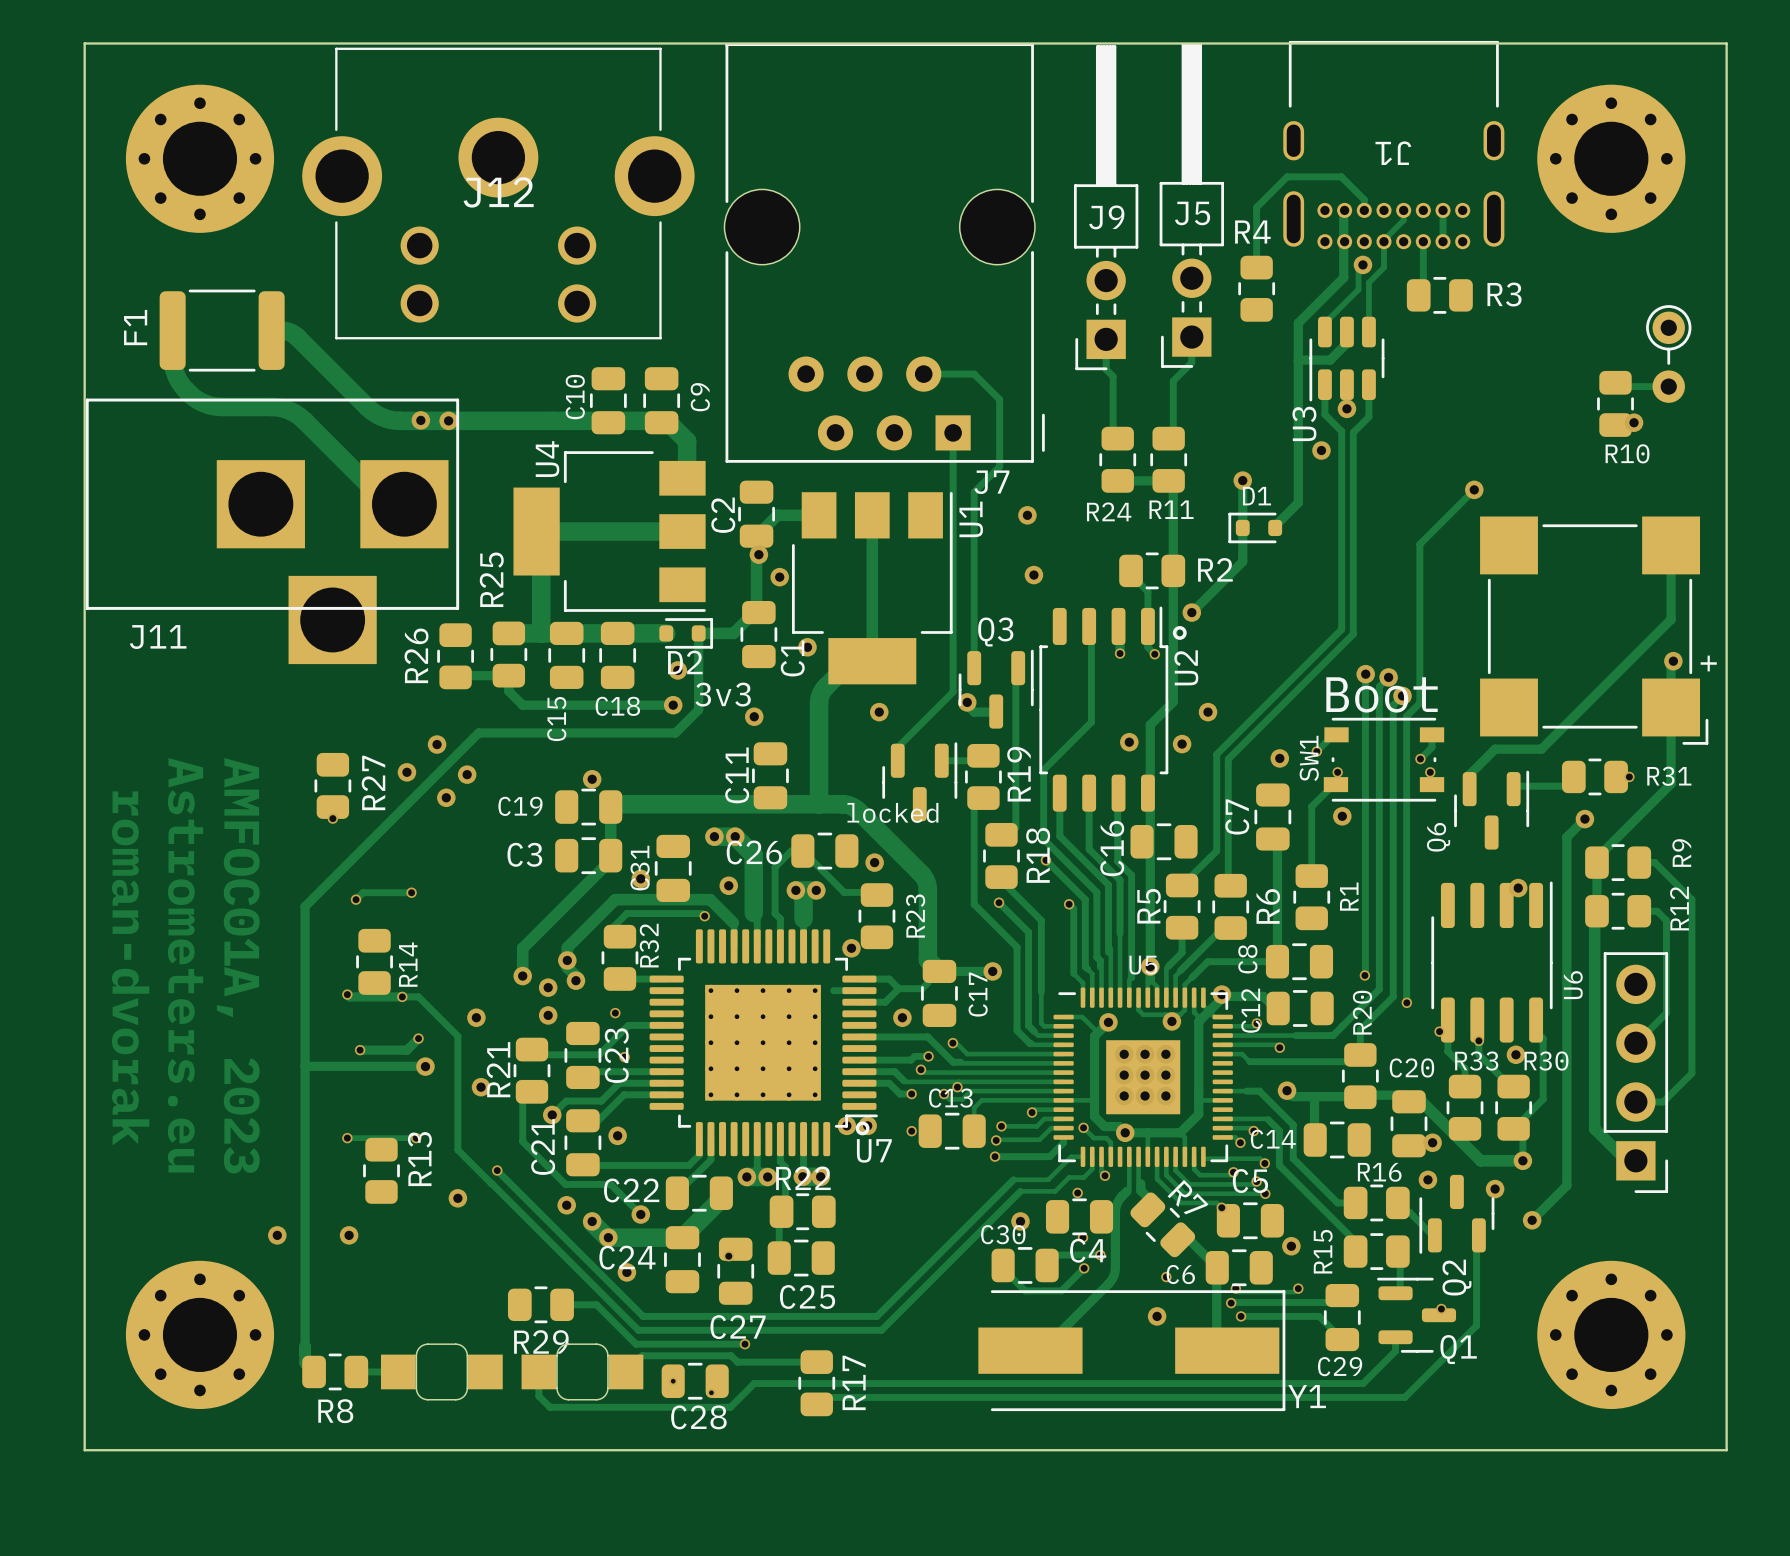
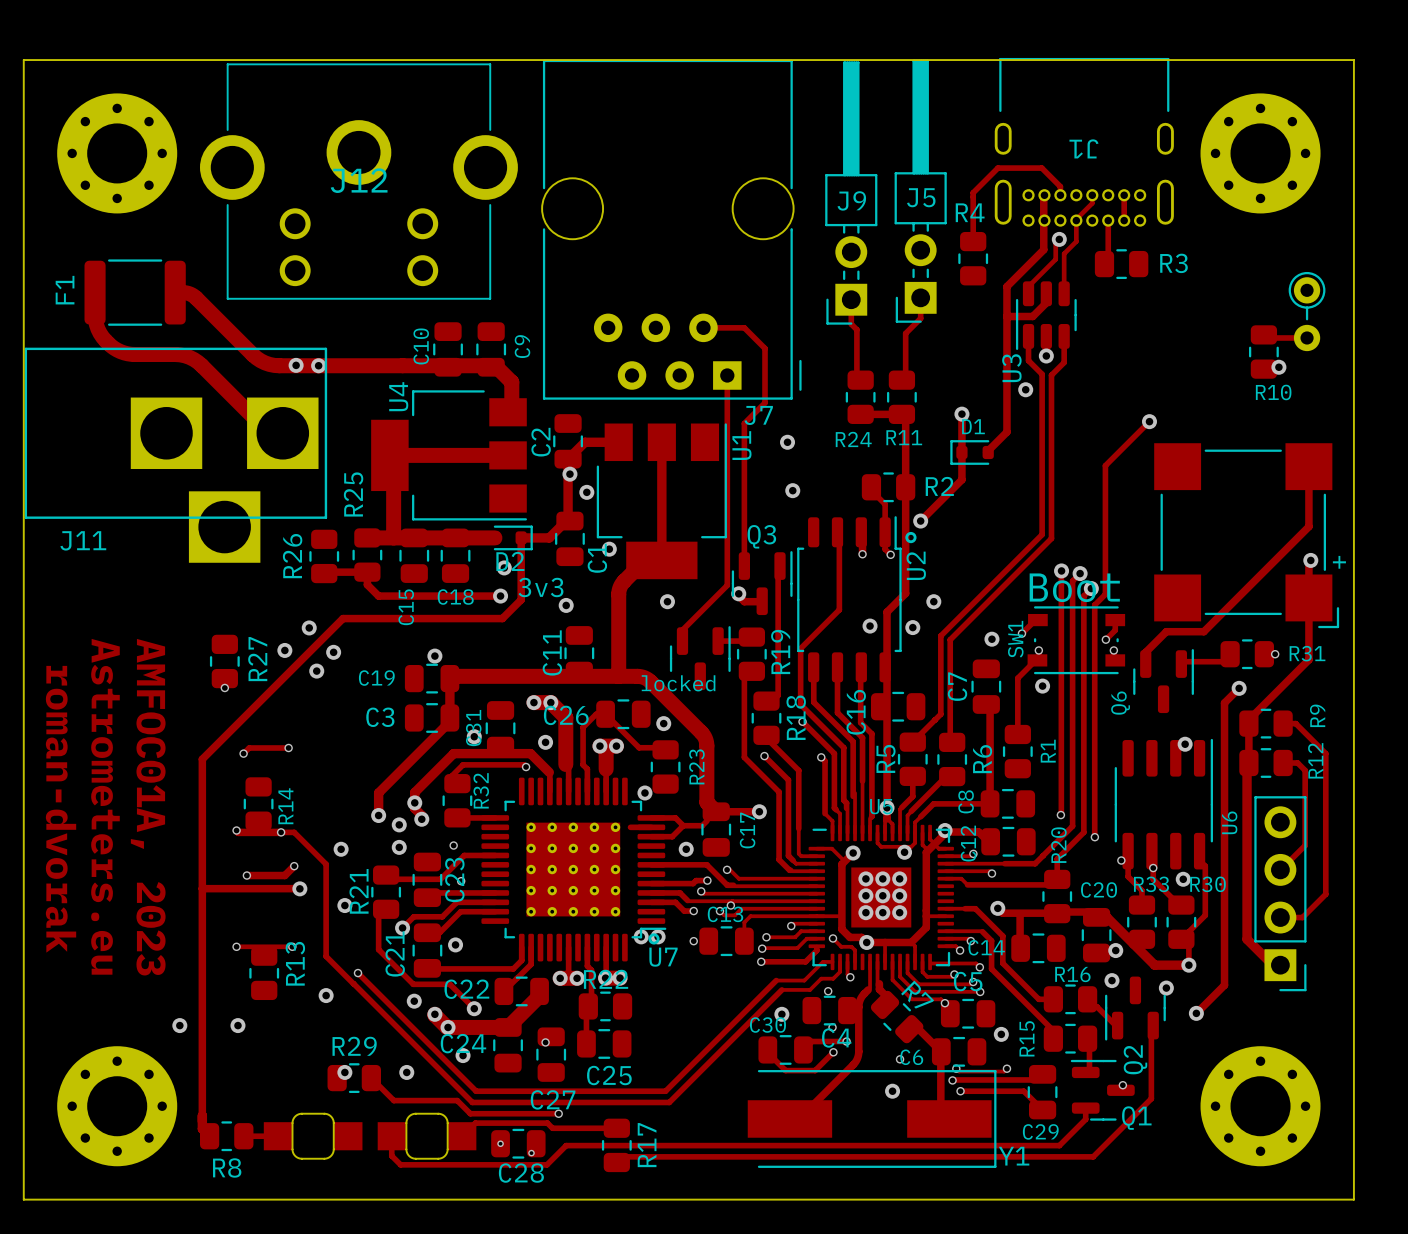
via: none -> (344, 1072)
via: none -> (406, 1072)
R29 position: (540, 1304) -> (354, 1078)
track: (571, 1304) (596, 1304) (619, 1327) -> (371, 1078) (393, 1100) (457, 1100)
R29 name position: R29 (541, 1341) -> R29 (354, 1046)

